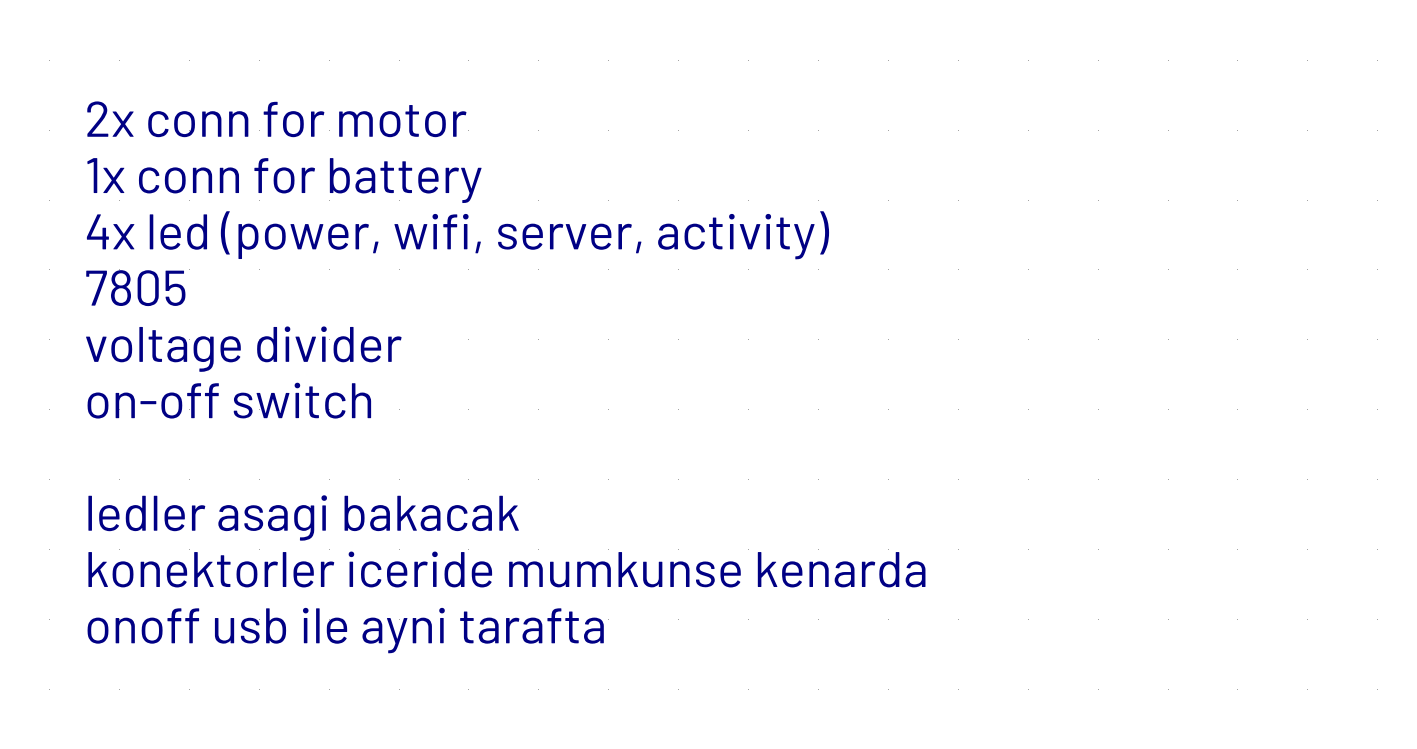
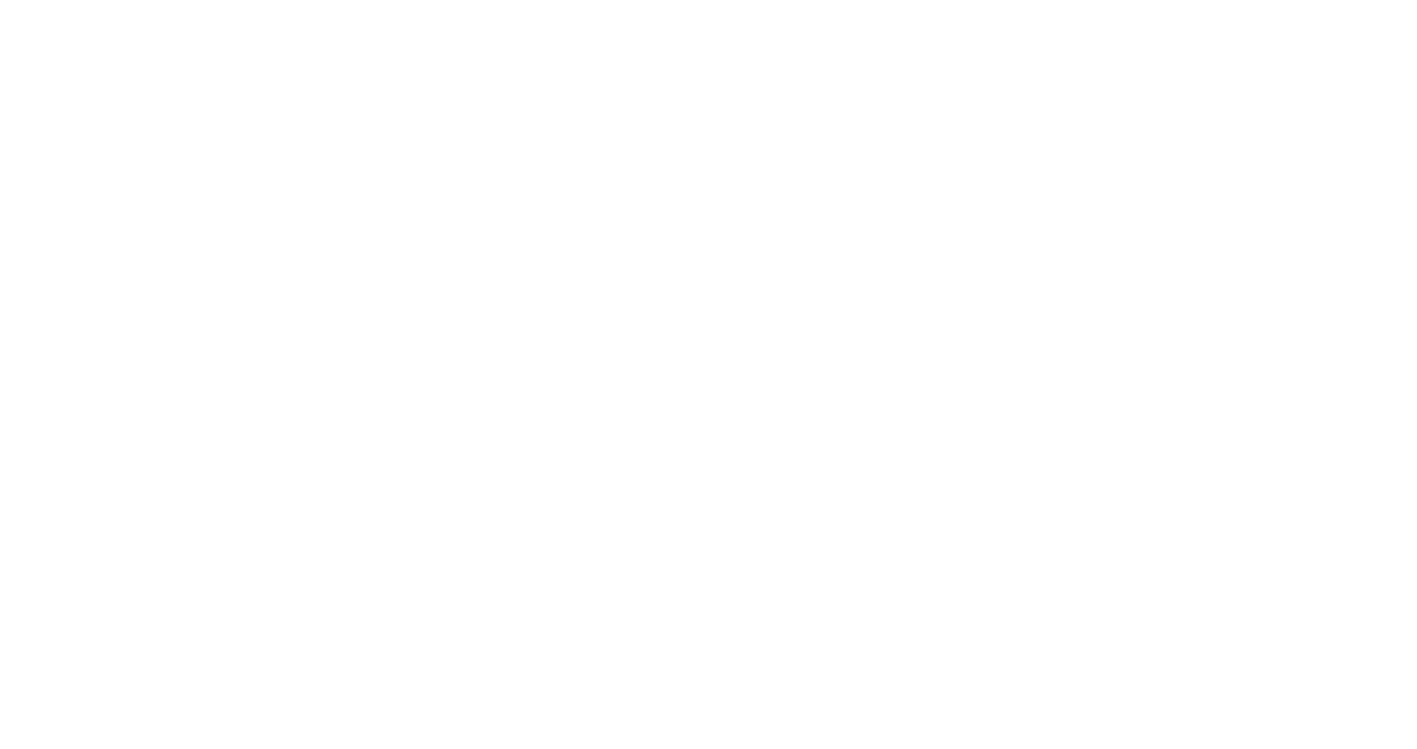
text: 2x conn for motor (276, 119) -> none
text: 1x conn for battery (284, 180) -> none
text: 4x led (power, wifi, server, activity) (457, 235) -> none
text: 7805 (135, 288) -> none
text: voltage divider (243, 349) -> none
text: on-off switch (229, 400) -> none
text: ledler asagi bakacak (303, 517) -> none
text: konektorler iceride mumkunse kenarda (506, 569) -> none
text: onoff usb ile ayni tarafta (345, 630) -> none

